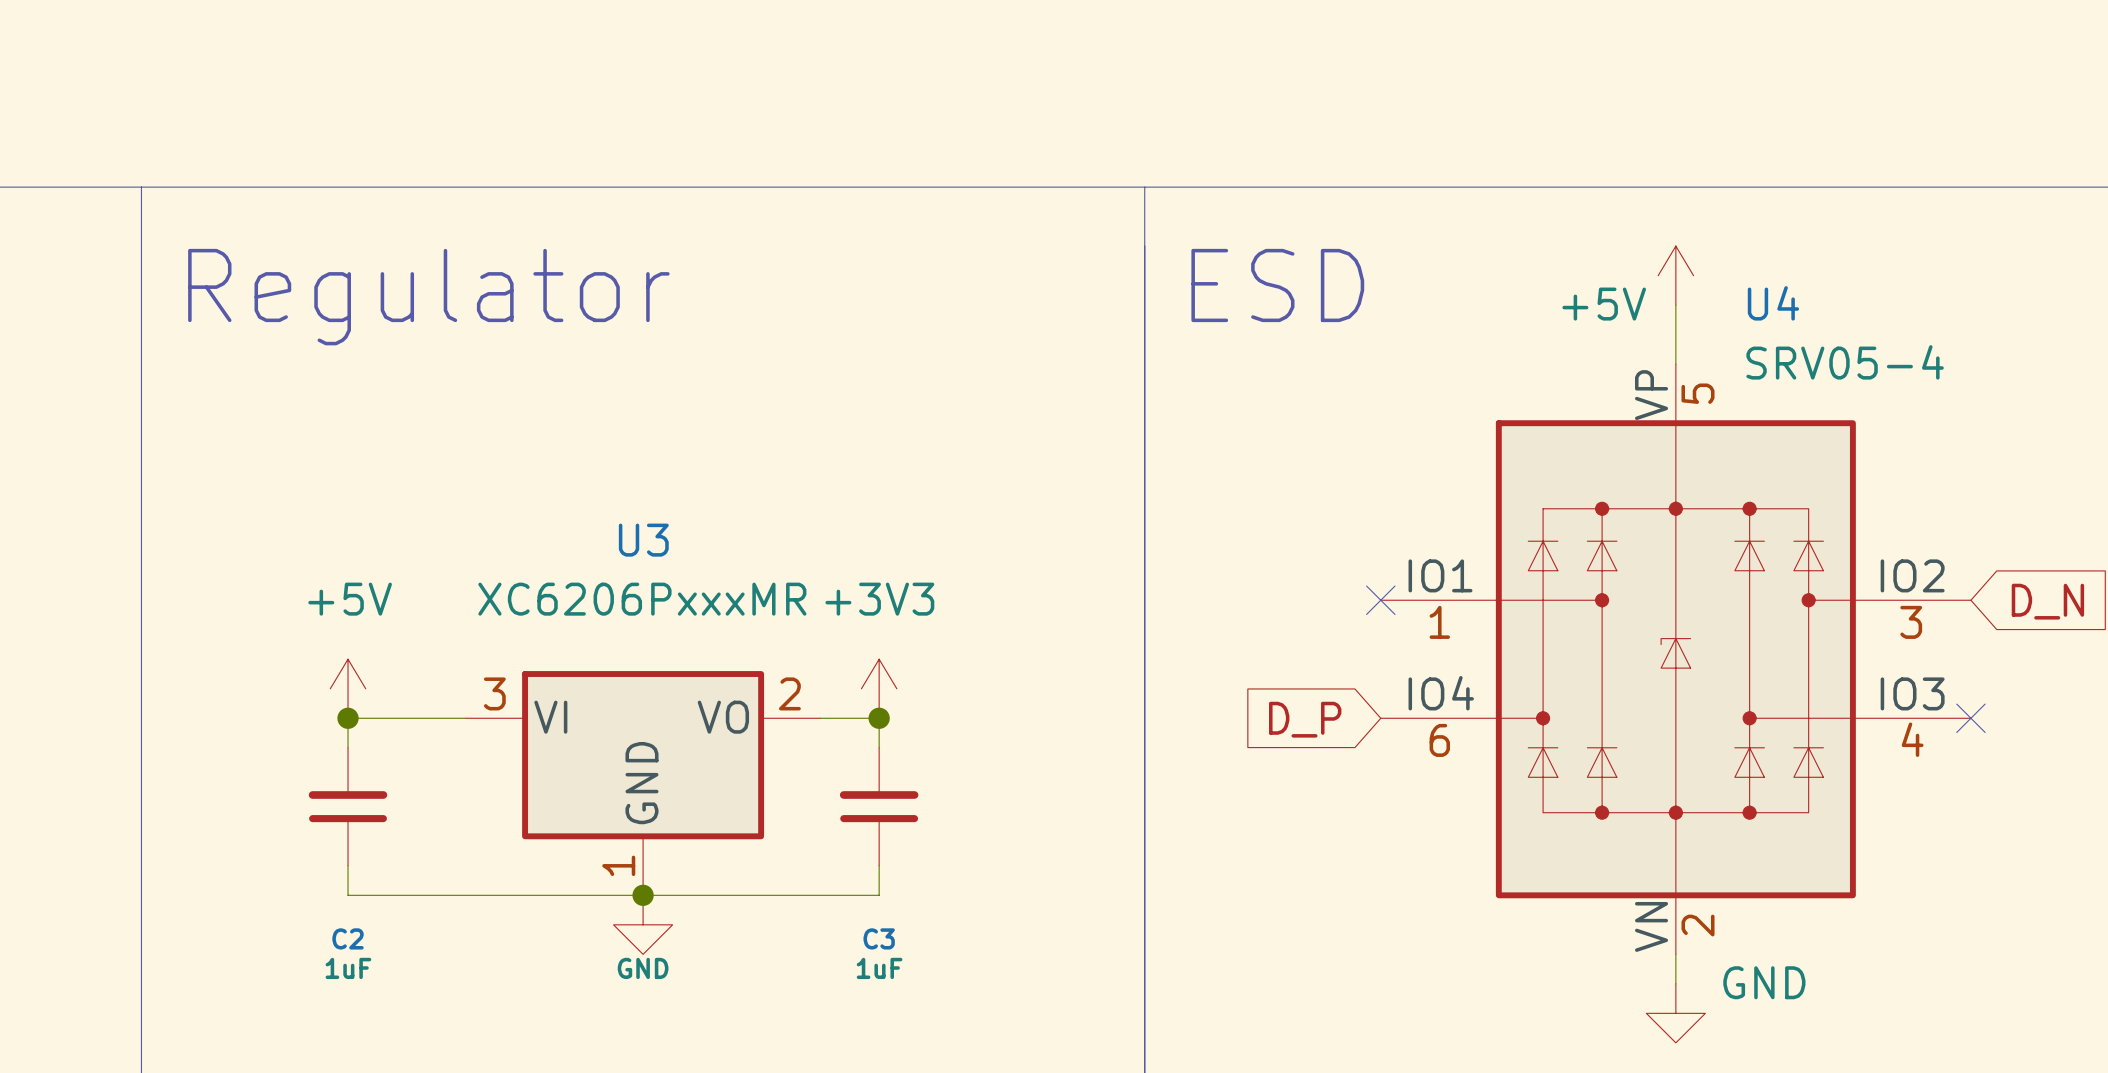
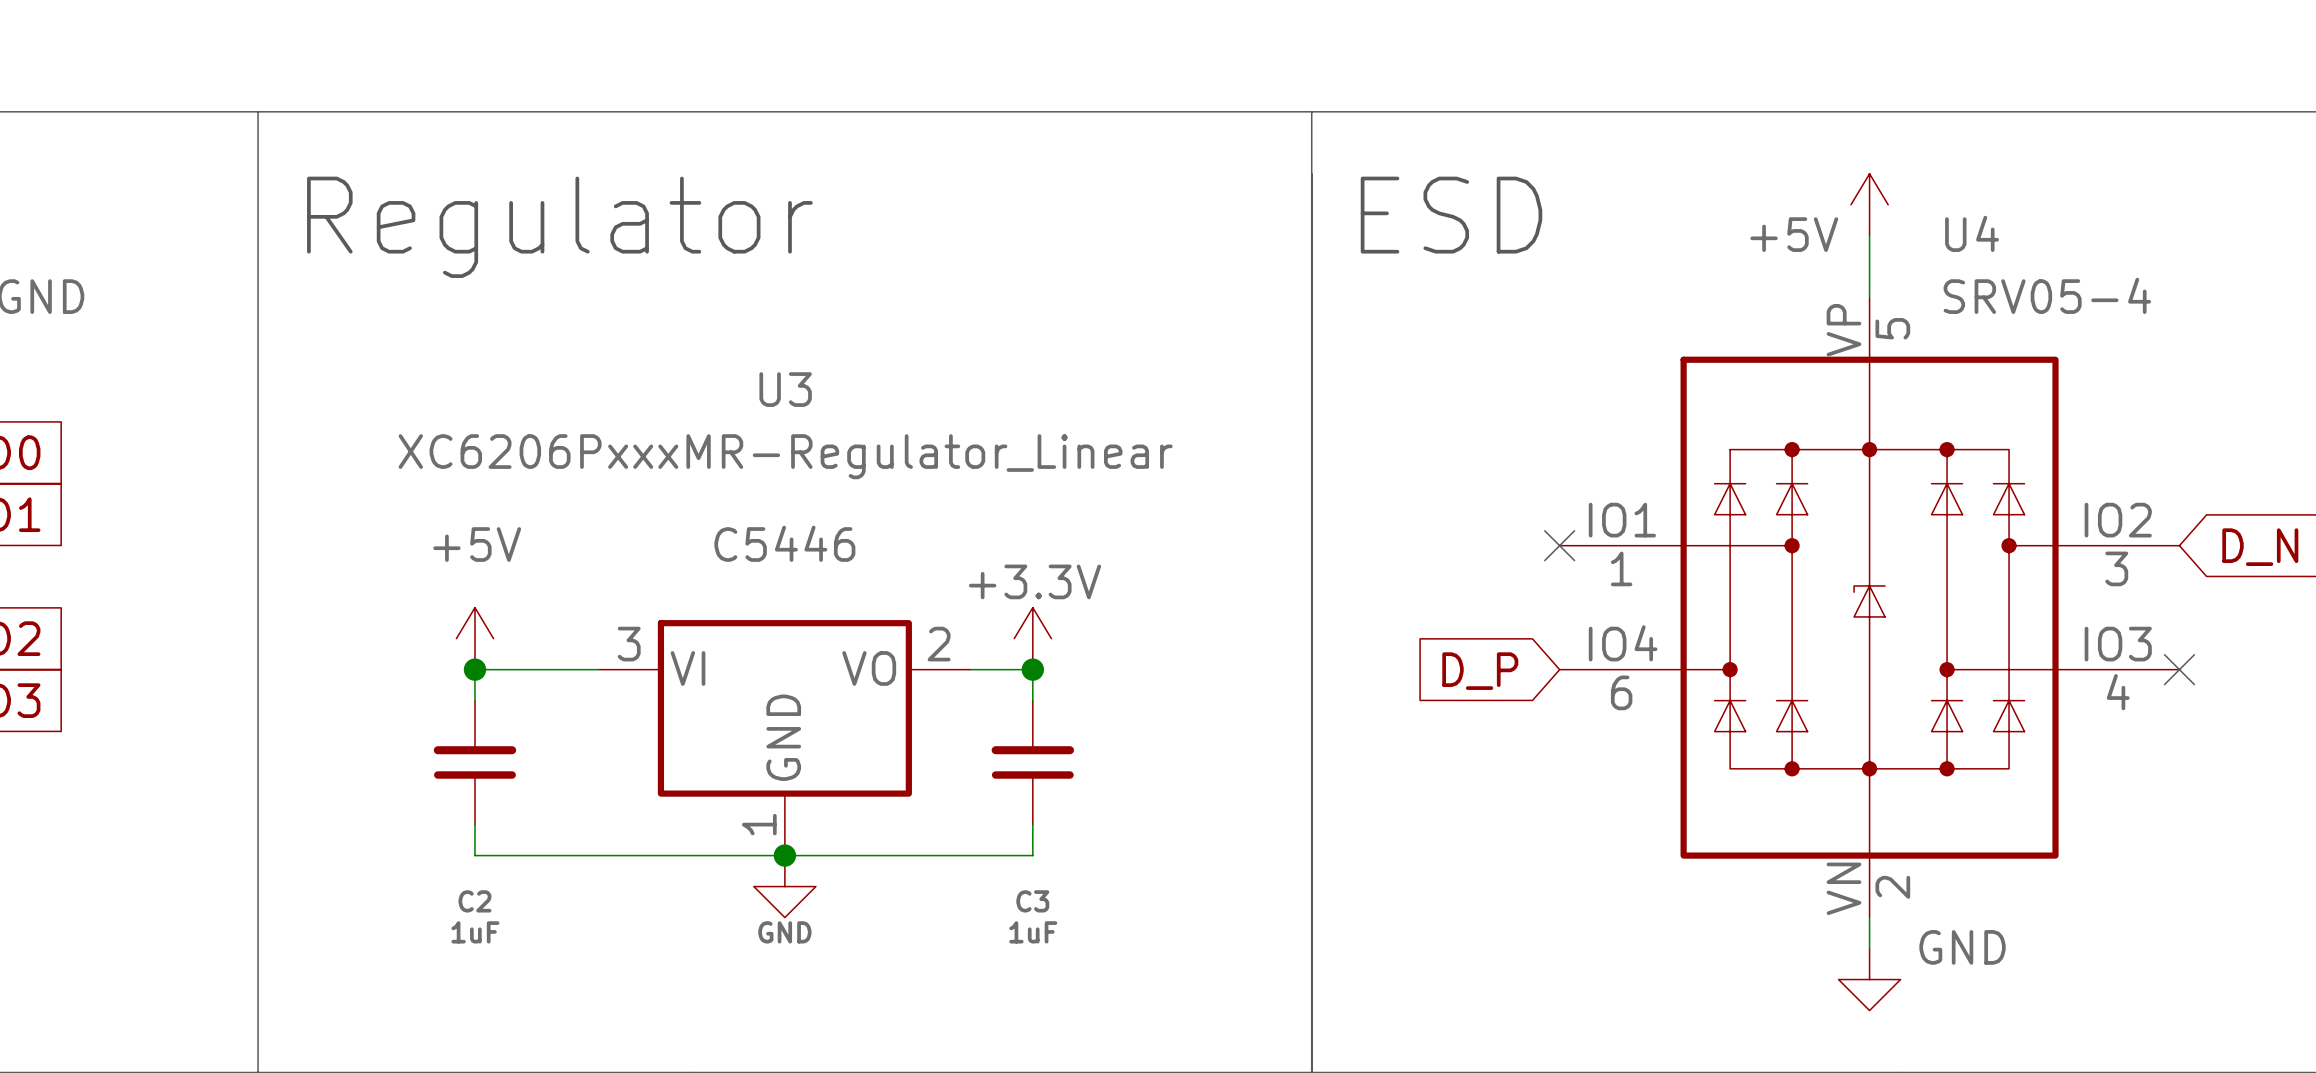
U3 name position: U3 (643, 540) -> U3 (785, 389)
U3 text: none -> C5446 (784, 543)
U3 value: XC6206PxxxMR (642, 599) -> XC6206PxxxMR-Regulator_Linear (785, 456)
power symbol: +3V3 (879, 688) -> +3.3V (1032, 638)

